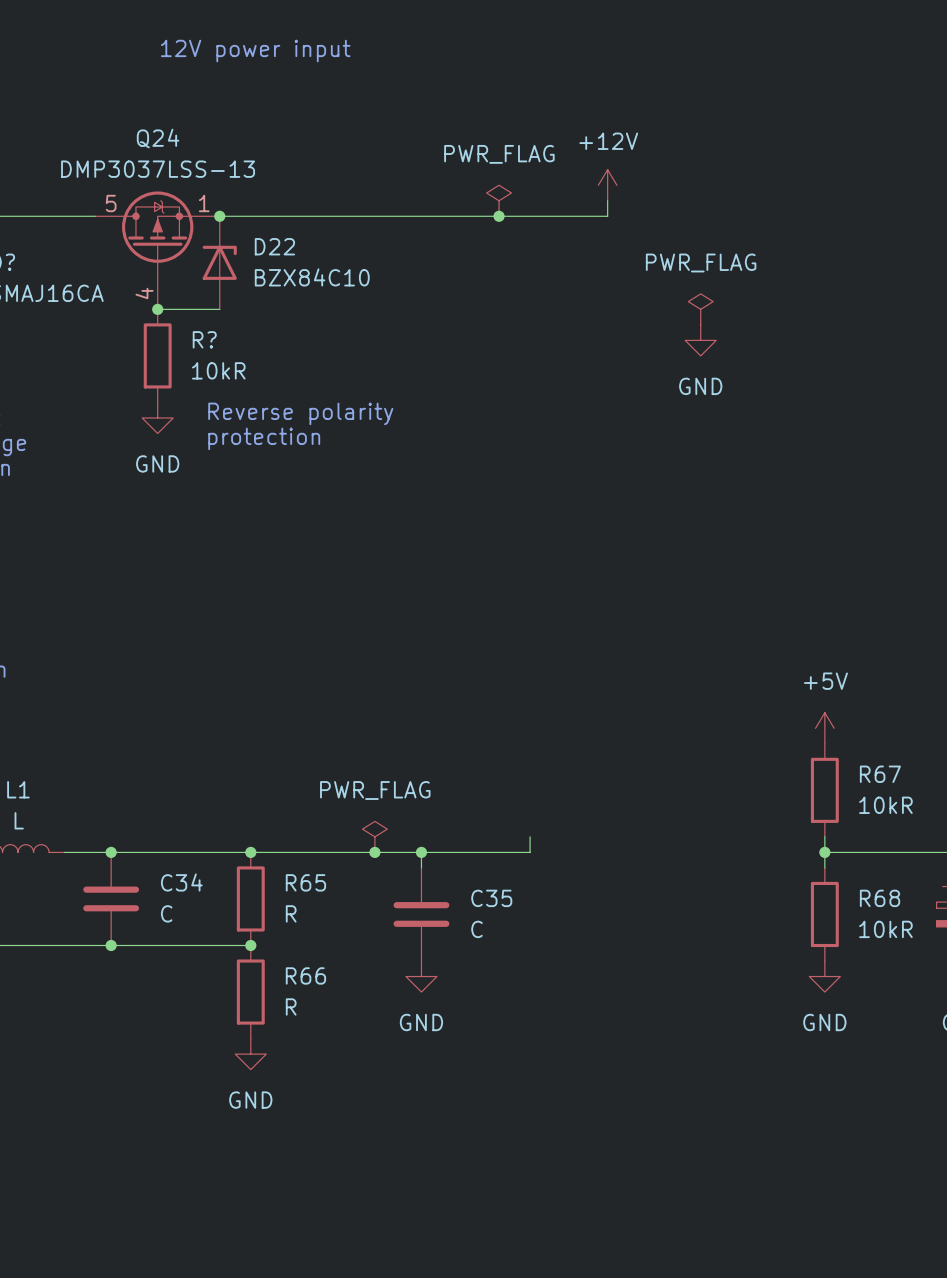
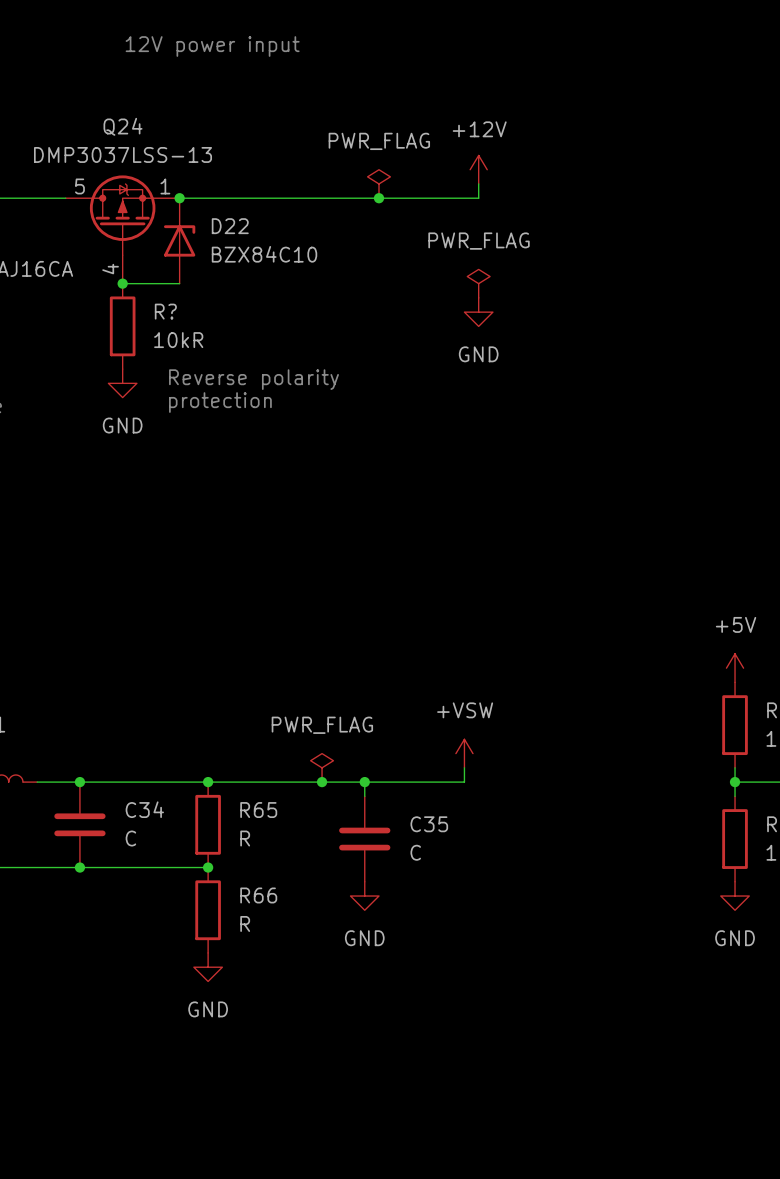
power symbol position: +12V (607, 185) -> +12V (478, 169)
power symbol: none -> PWR_FLAG (379, 183)
power symbol: PWR_FLAG (499, 200) -> none
wire: (607, 200) (607, 216) (545, 216) -> (478, 183) (478, 198)
junction position: (499, 216) -> (379, 198)
power symbol: none -> PWR_FLAG (478, 283)
power symbol: PWR_FLAG (700, 309) -> none
power symbol position: GND (700, 340) -> GND (478, 312)
power symbol: none -> +VSW (464, 753)

